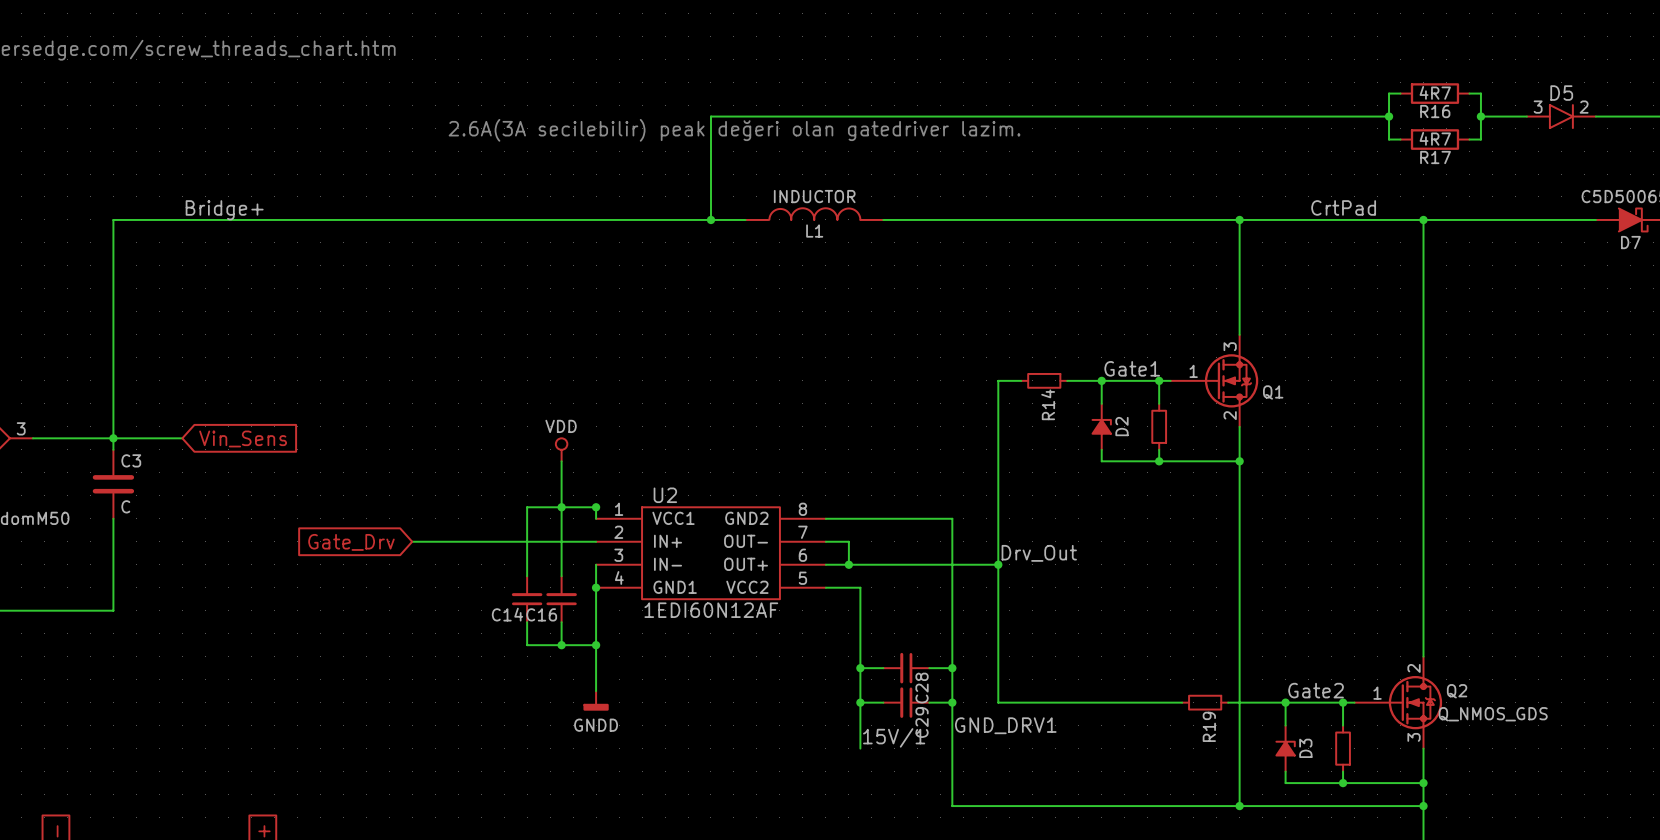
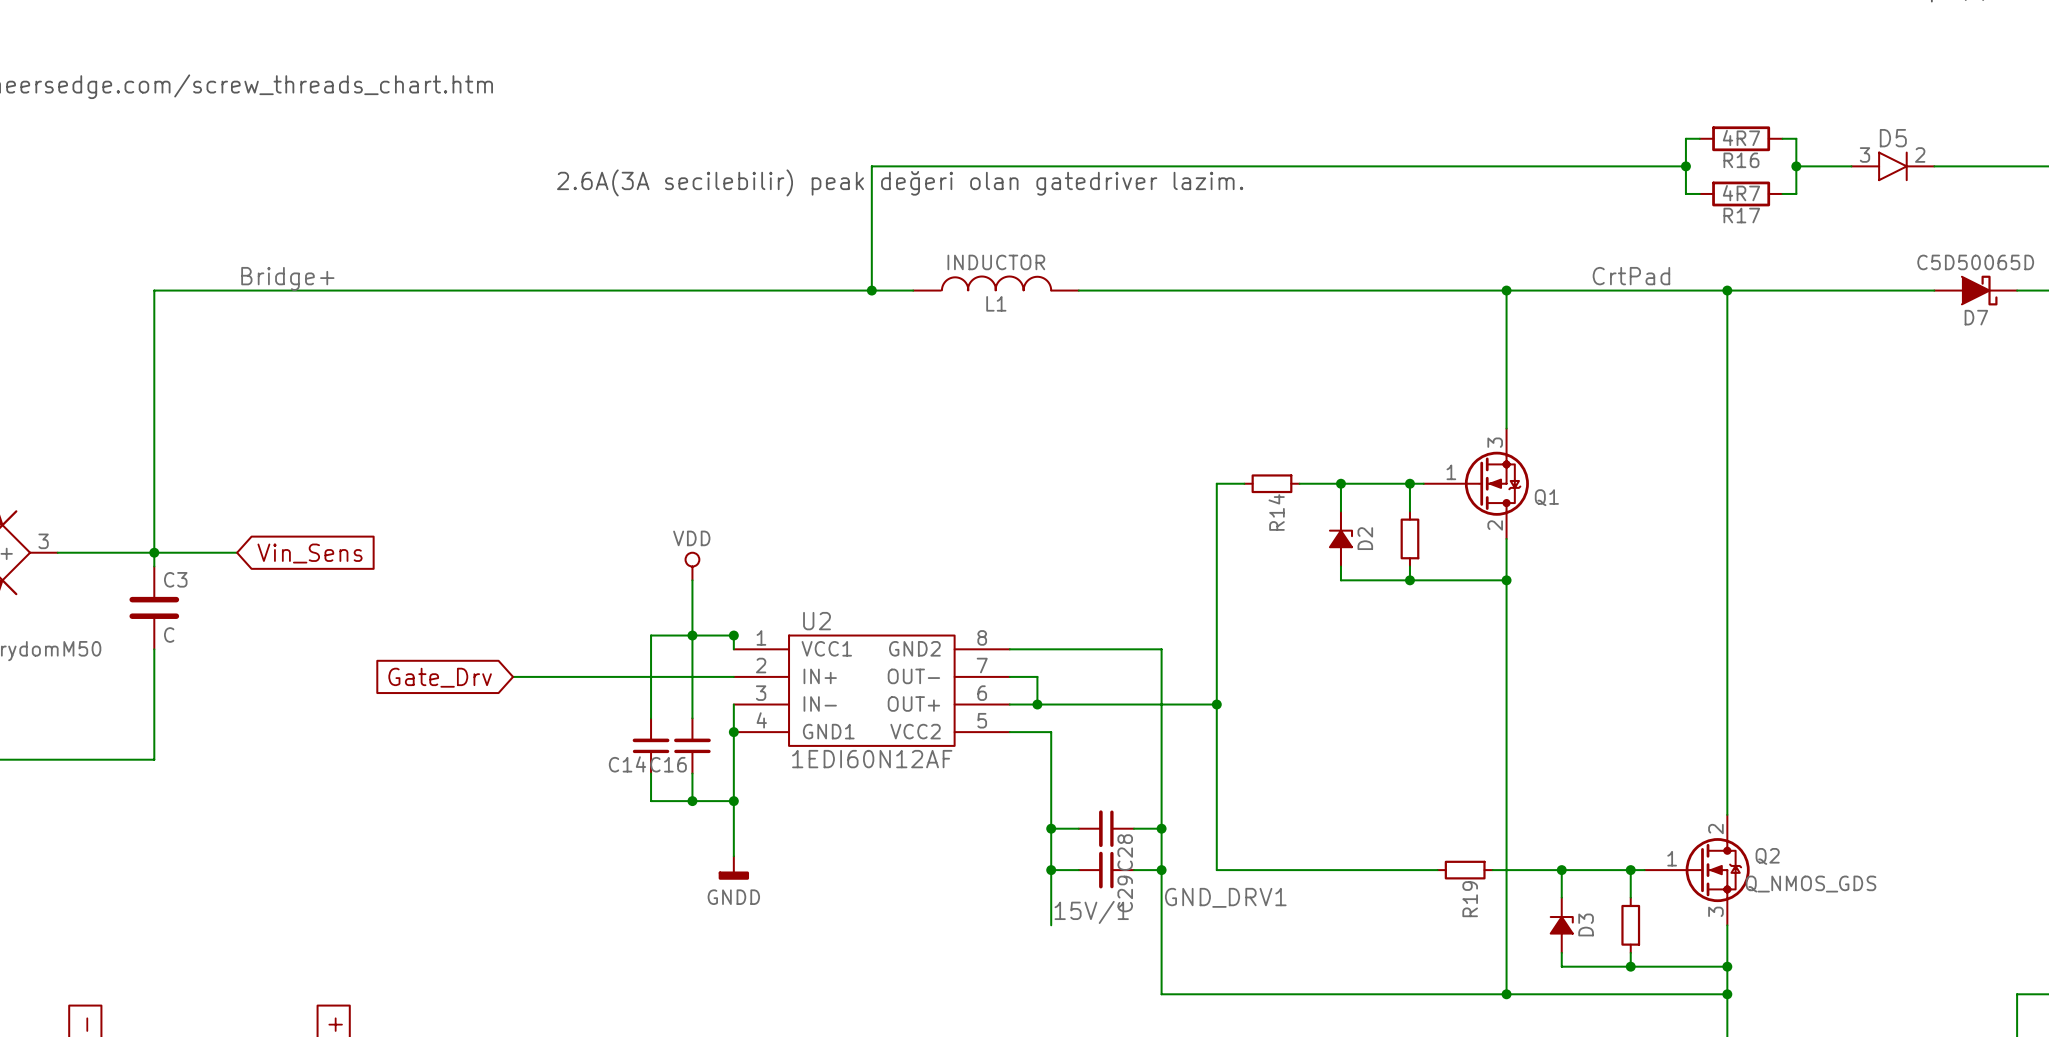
label: Gate1 (1132, 368) -> none
label: Drv_Out (1039, 553) -> none
label: Gate2 (1316, 690) -> none

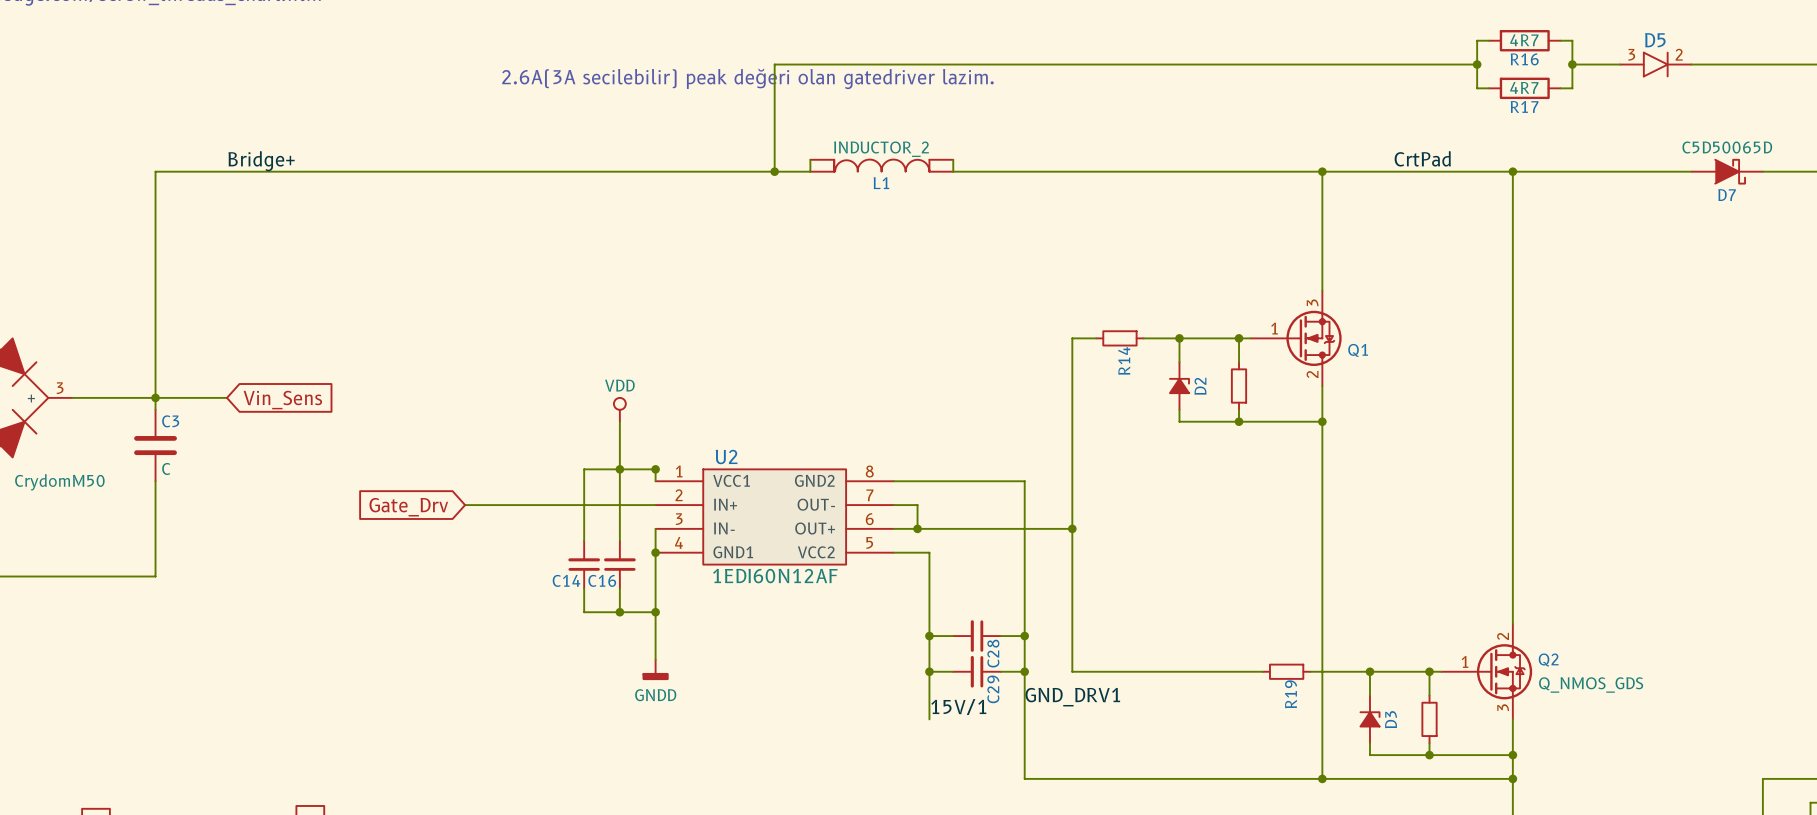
L1 value: INDUCTOR (996, 262) -> INDUCTOR_2 (881, 149)
wire: none -> (810, 159) (810, 171)
L1 symbol: [913, 276, 1079, 291] -> [810, 159, 954, 172]
wire: none -> (953, 159) (953, 171)

